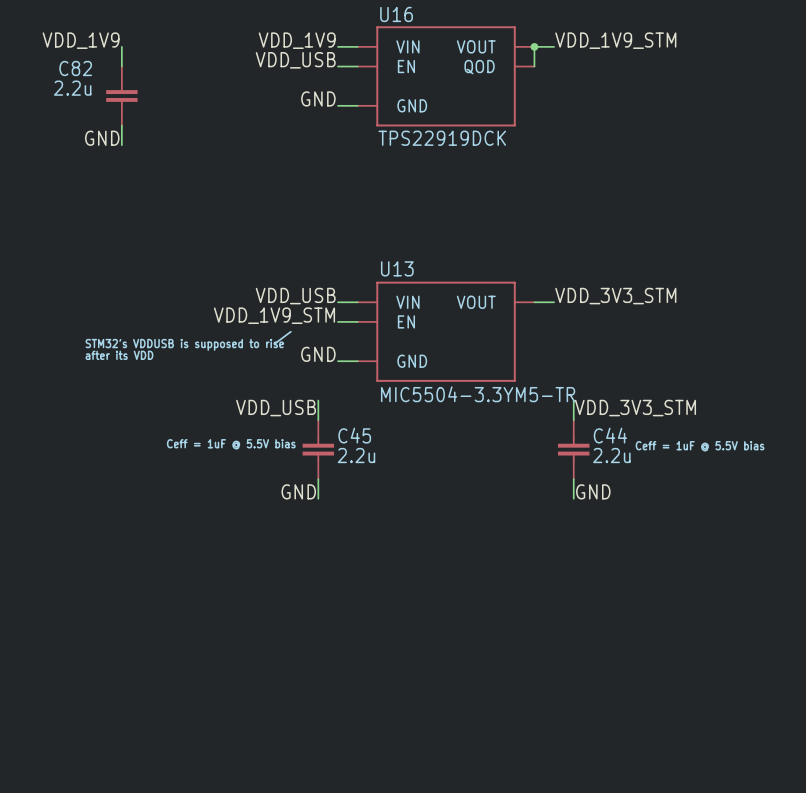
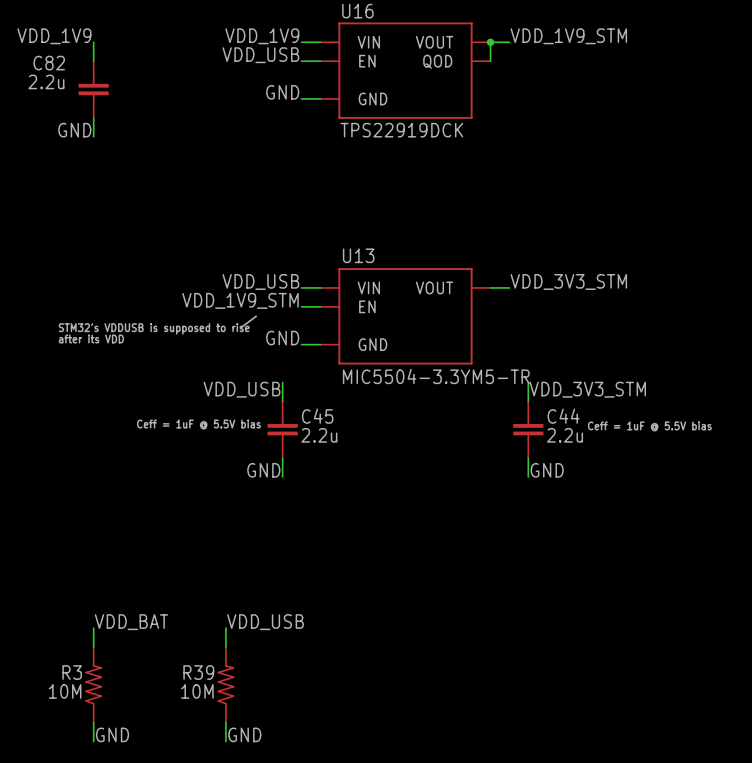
label: none -> VDD_BAT (131, 622)
label: none -> VDD_USB (265, 622)
wire: none -> (93, 628) (93, 647)
wire: none -> (225, 628) (225, 647)
R3: none -> 10M (93, 684)
R39: none -> 10M (225, 684)
wire: none -> (93, 722) (93, 741)
wire: none -> (225, 722) (225, 741)
label: none -> GND (112, 734)
label: none -> GND (244, 734)

